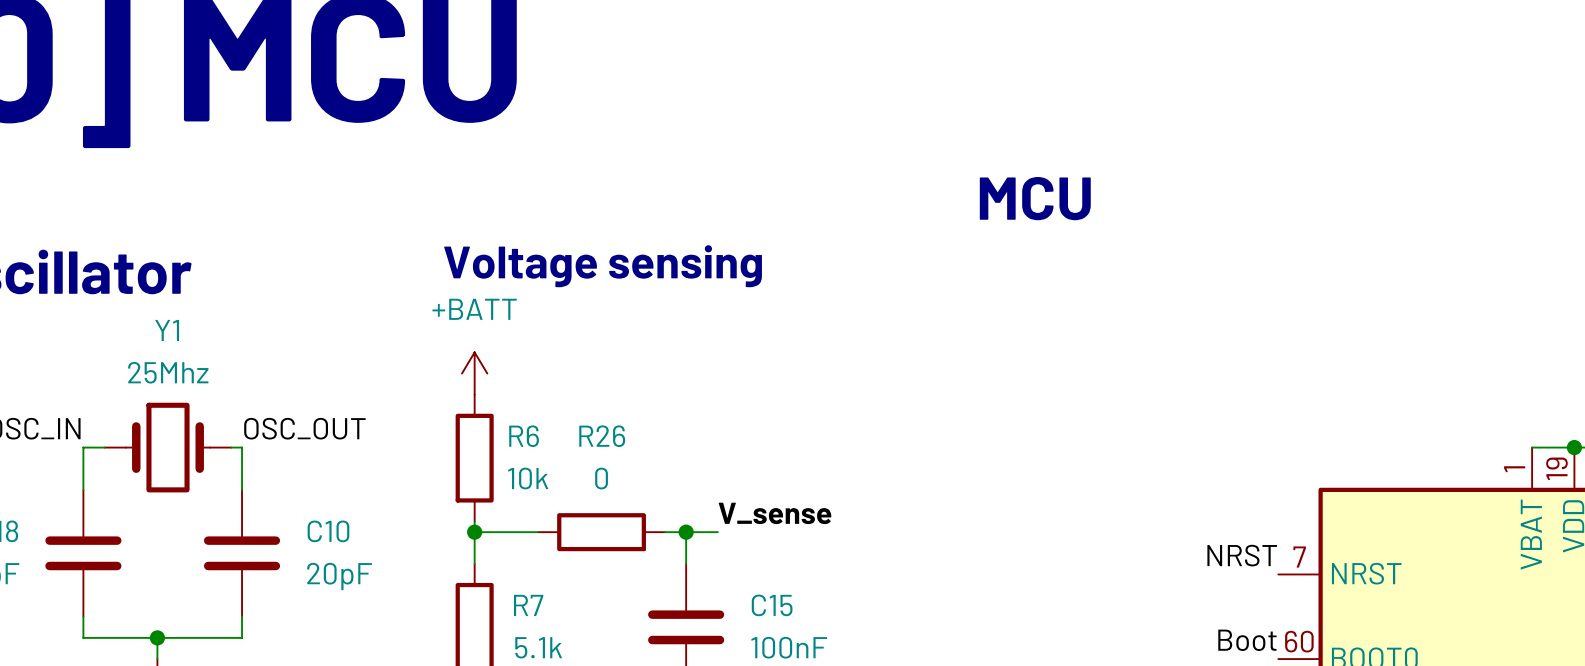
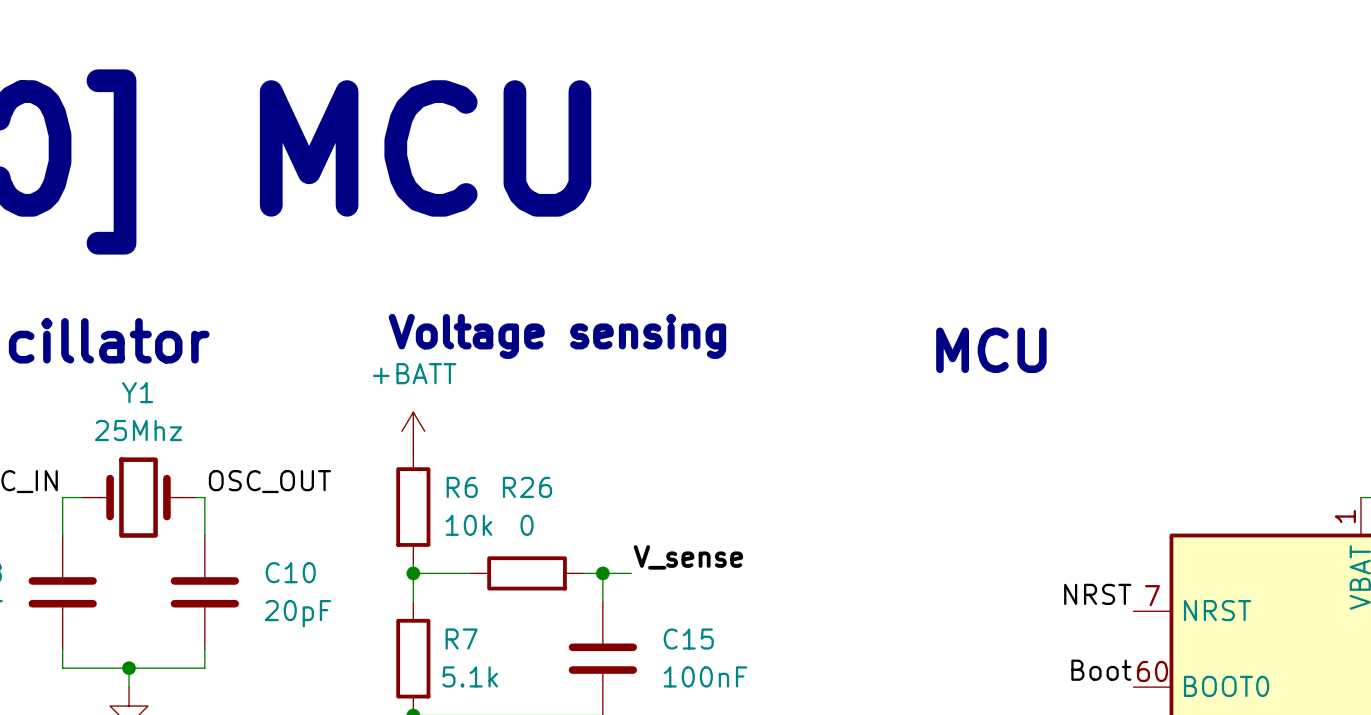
text position: MCU (1035, 198) -> MCU (991, 350)

